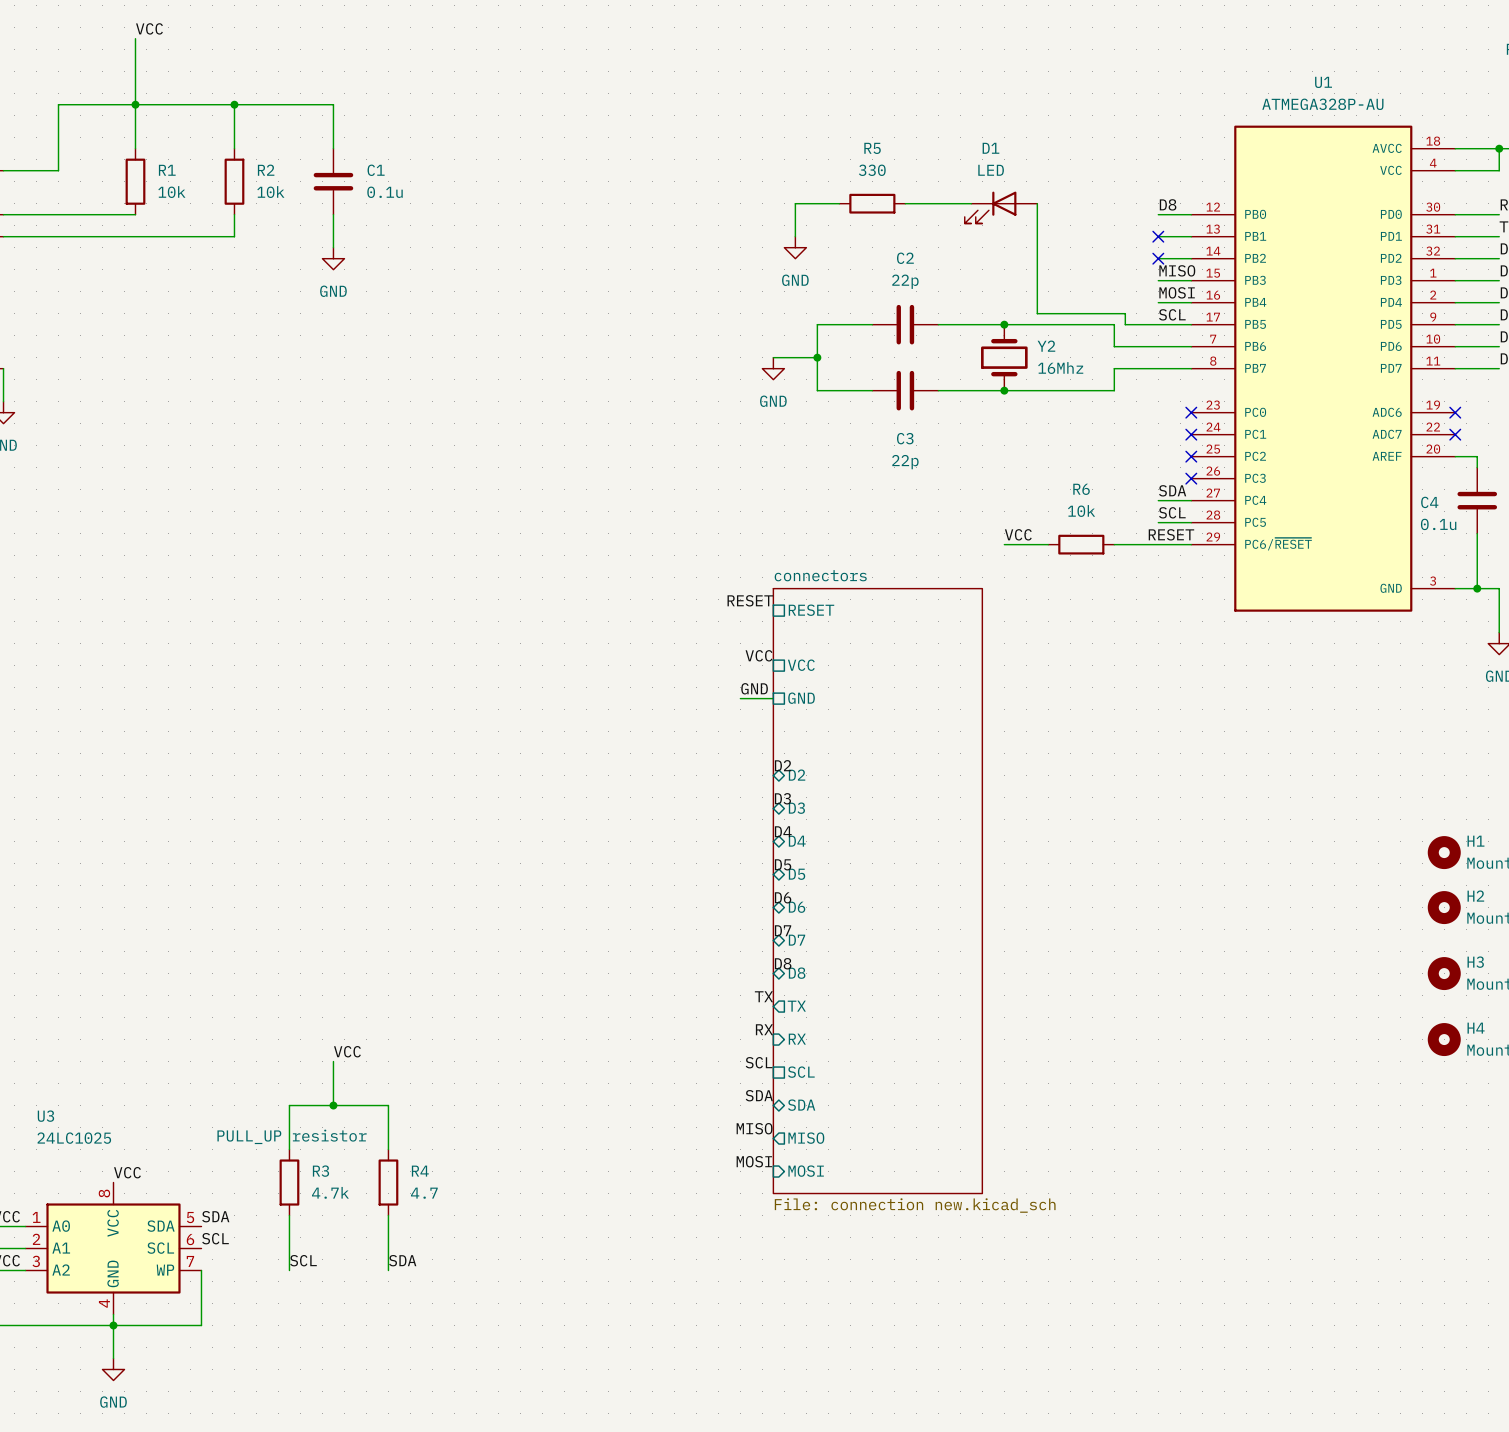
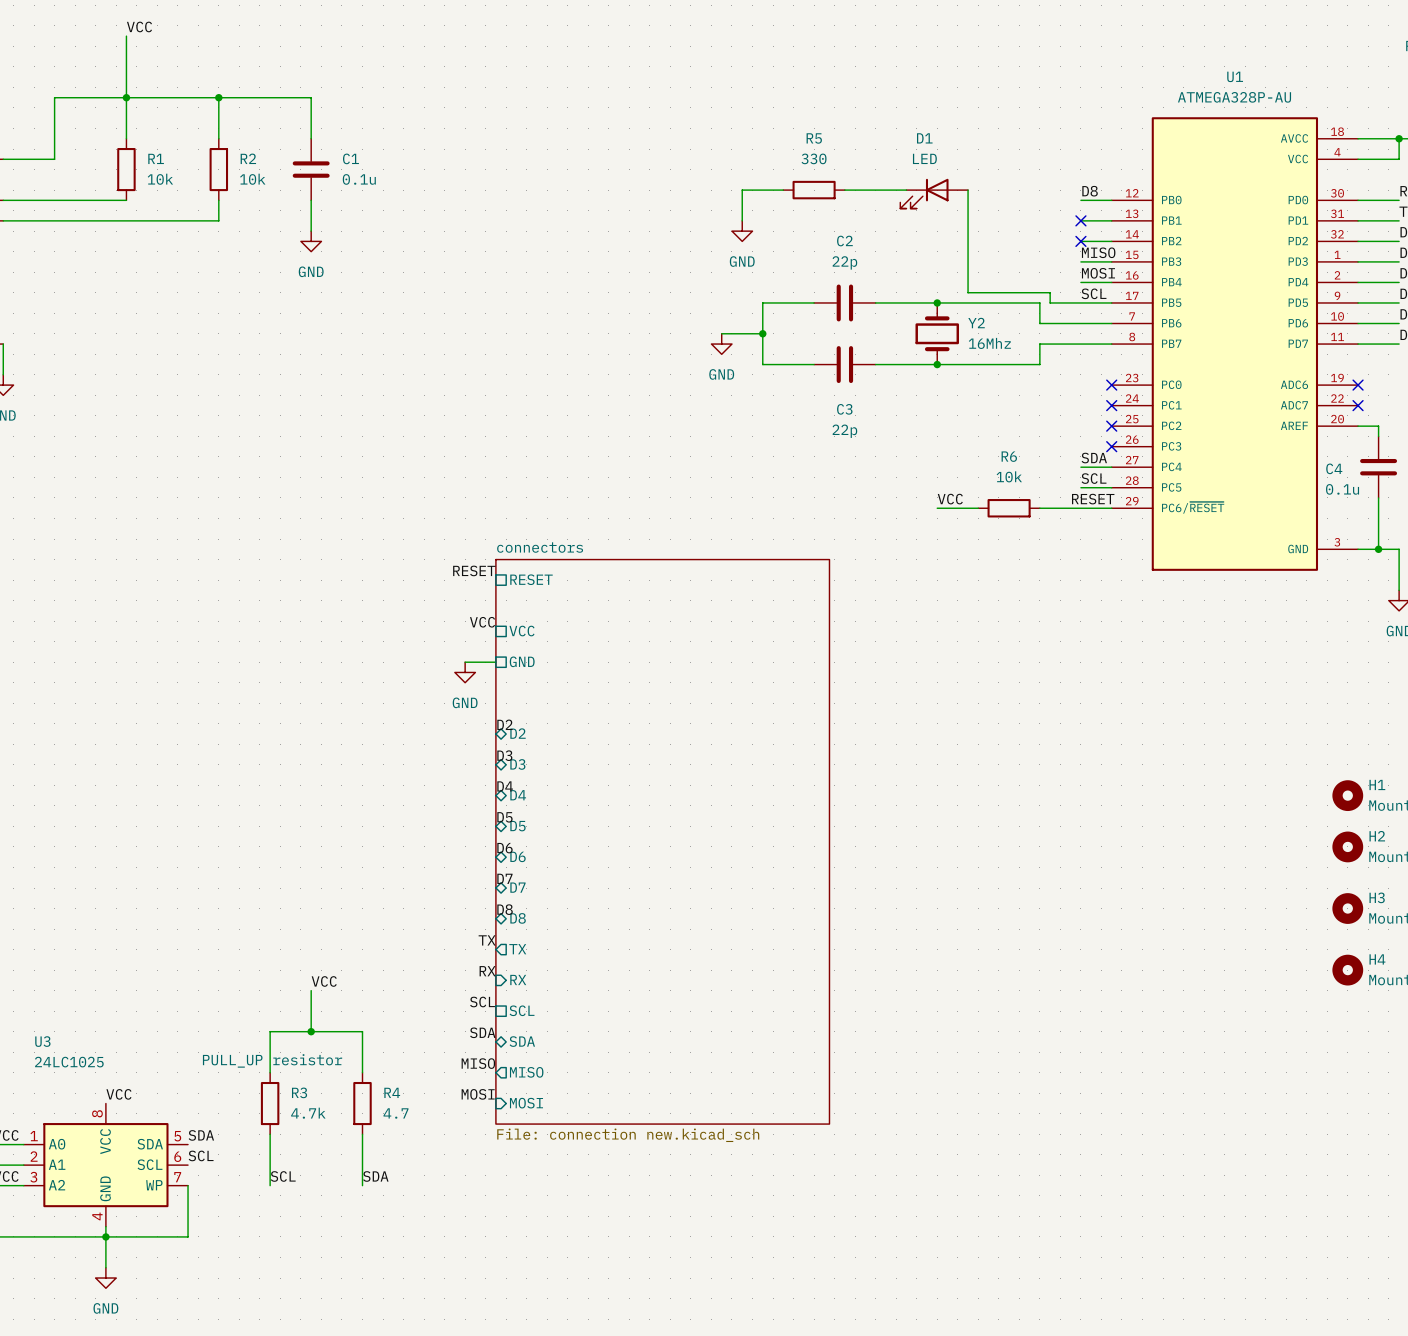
label: RESET (750, 600) -> none
sheet pin: RESET (811, 610) -> none
label: none -> RESET (474, 570)
sheet pin: none -> RESET (531, 579)
label: VCC (758, 655) -> none
sheet pin: VCC (801, 665) -> none
label: none -> VCC (482, 622)
sheet pin: none -> VCC (522, 631)
label: GND (754, 688) -> none
wire: (740, 698) (773, 698) -> none
sheet pin: GND (801, 698) -> none
wire: none -> (465, 662) (495, 662)
sheet pin: none -> GND (522, 661)
power symbol: none -> GND (465, 672)
label: D2 (783, 765) -> none
sheet pin: D2 (797, 775) -> none
label: none -> D2 (504, 724)
sheet pin: none -> D2 (518, 733)
label: D3 (782, 798) -> none
sheet pin: D3 (796, 808) -> none
label: none -> D3 (504, 755)
sheet pin: none -> D3 (517, 764)
label: D4 (783, 831) -> none
sheet pin: D4 (797, 841) -> none
label: none -> D4 (505, 786)
sheet pin: none -> D4 (518, 795)
label: D5 (783, 864) -> none
sheet pin: D5 (797, 874) -> none
label: none -> D5 (504, 817)
sheet pin: none -> D5 (517, 826)
sheet connectors: File: connection new.kicad_sch (877, 891) -> none
label: D6 (783, 897) -> none
sheet connectors: none -> File: connection new.kicad_sch (662, 841)
sheet pin: D6 (797, 907) -> none
label: none -> D6 (504, 848)
sheet pin: none -> D6 (518, 856)
label: D7 (783, 930) -> none
sheet pin: D7 (797, 940) -> none
label: none -> D7 (504, 878)
sheet pin: none -> D7 (517, 887)
label: D8 (783, 963) -> none
sheet pin: D8 (797, 973) -> none
label: none -> D8 (505, 909)
sheet pin: none -> D8 (518, 918)
label: TX (763, 996) -> none
sheet pin: TX (796, 1006) -> none
label: none -> TX (487, 940)
sheet pin: none -> TX (517, 949)
label: RX (764, 1029) -> none
sheet pin: RX (797, 1039) -> none
label: none -> RX (487, 971)
sheet pin: none -> RX (518, 979)
label: SCL (759, 1062) -> none
sheet pin: SCL (801, 1072) -> none
label: none -> SCL (482, 1002)
sheet pin: none -> SCL (522, 1010)
label: SDA (759, 1095) -> none
sheet pin: SDA (801, 1105) -> none
label: none -> SDA (482, 1032)
sheet pin: none -> SDA (522, 1041)
label: MISO (754, 1128) -> none
sheet pin: MISO (806, 1138) -> none
label: none -> MISO (478, 1063)
sheet pin: none -> MISO (526, 1072)
label: MOSI (754, 1161) -> none
sheet pin: MOSI (806, 1171) -> none
label: none -> MOSI (478, 1094)
sheet pin: none -> MOSI (526, 1103)

